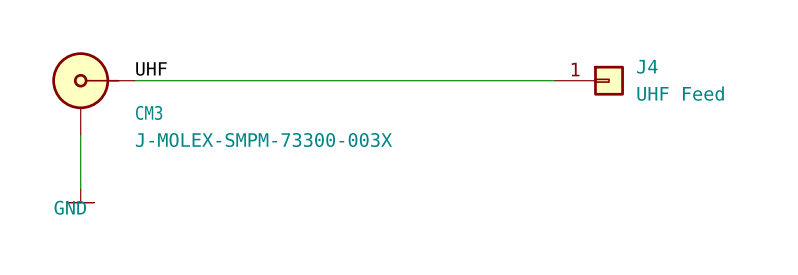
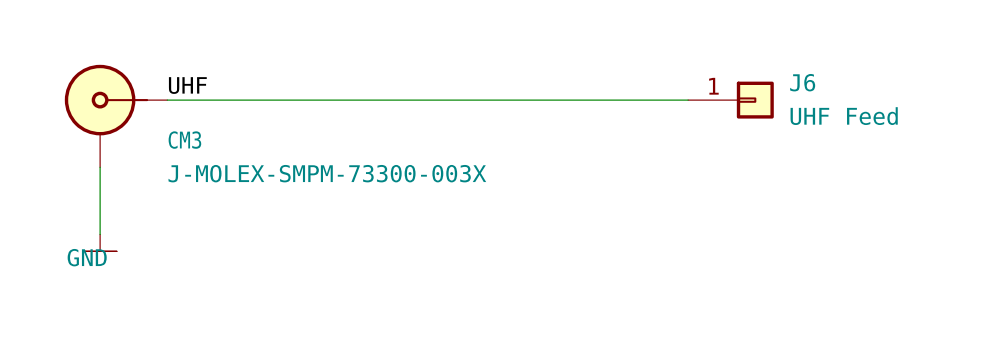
J4 name: J4 (647, 66) -> J6 (802, 82)

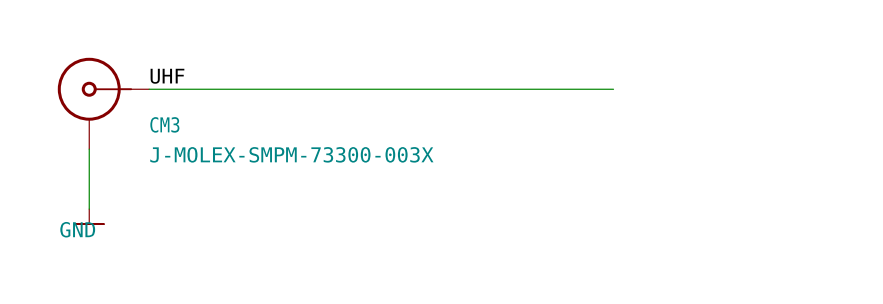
CM3 symbol: [64, 64, 168, 168] -> [57, 57, 150, 150]
J6: UHF Feed (730, 100) -> none

